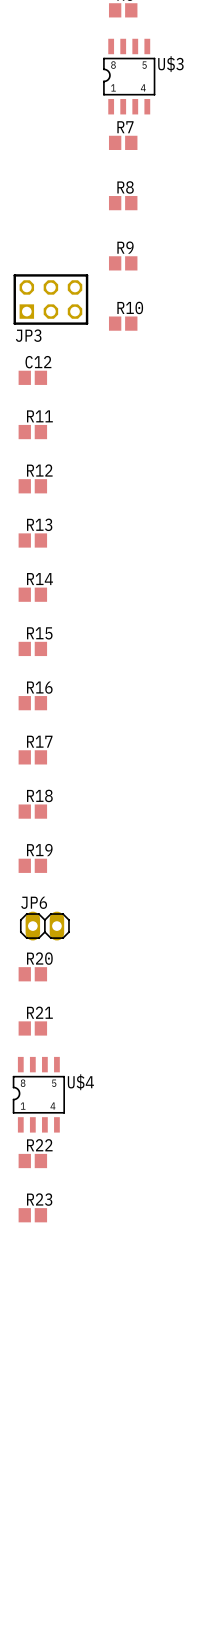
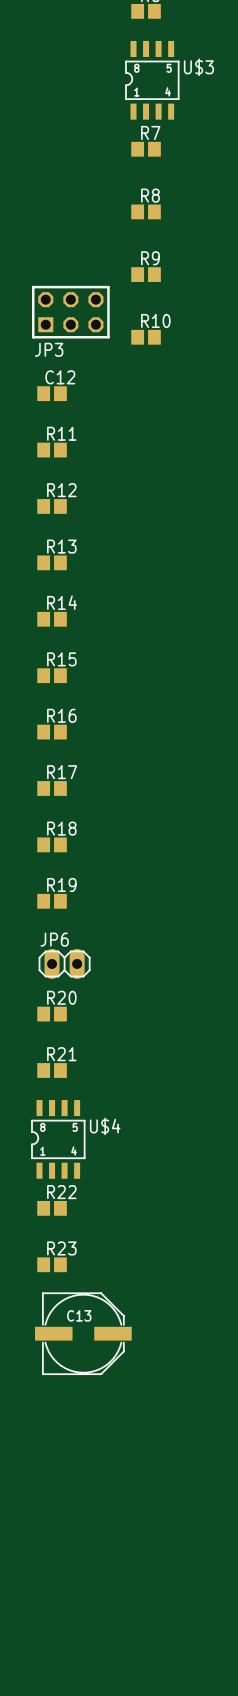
C13: none -> (83, 1333)

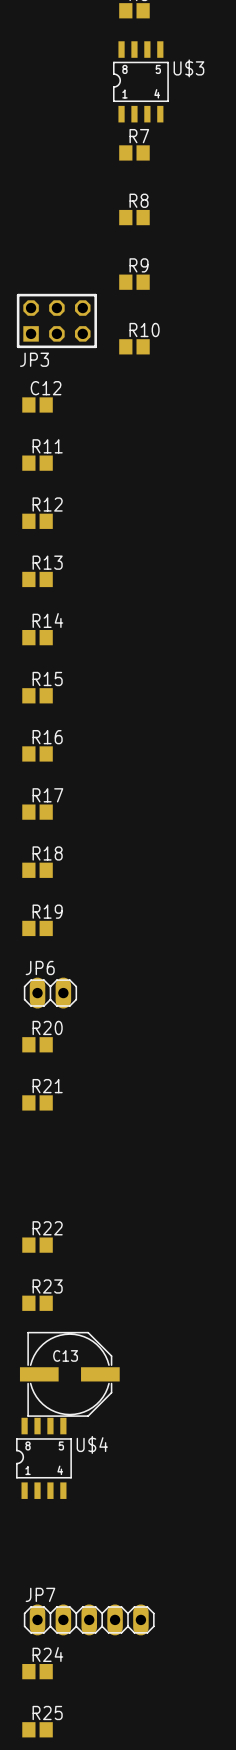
U$4 position: (58, 1139) -> (43, 1458)
JP7: none -> (89, 1619)
R24: none -> (37, 1671)
R25: none -> (37, 1729)

